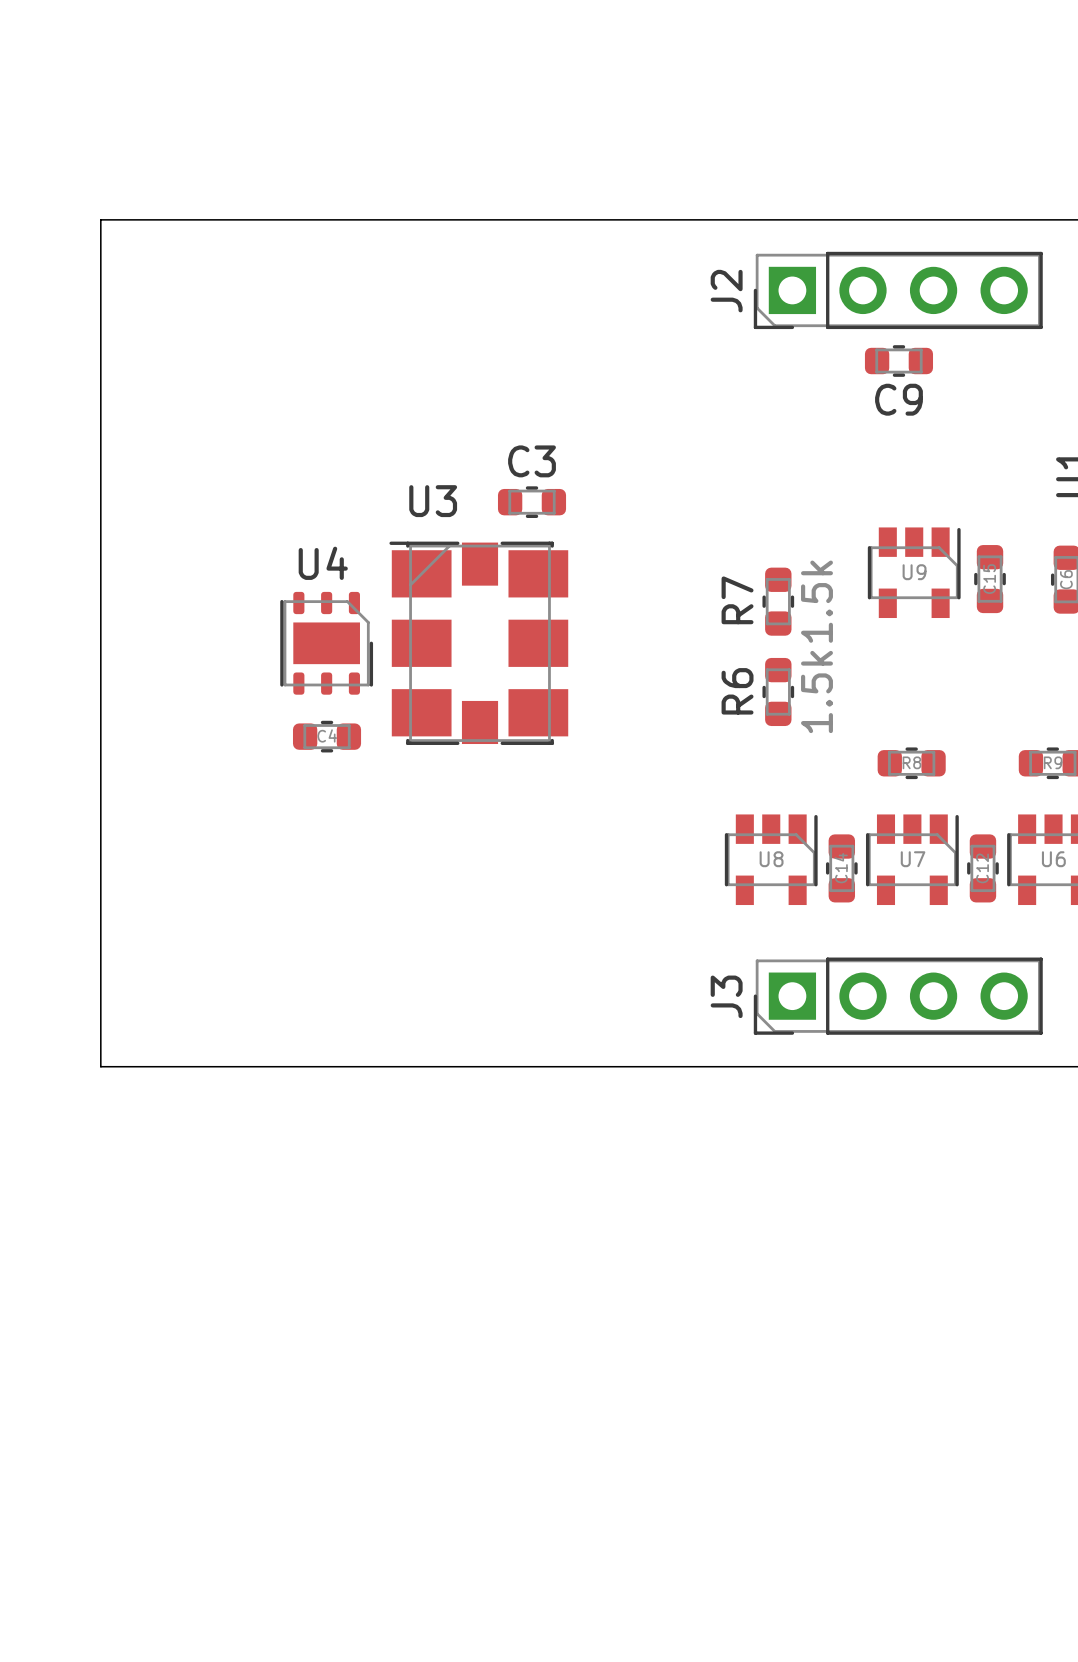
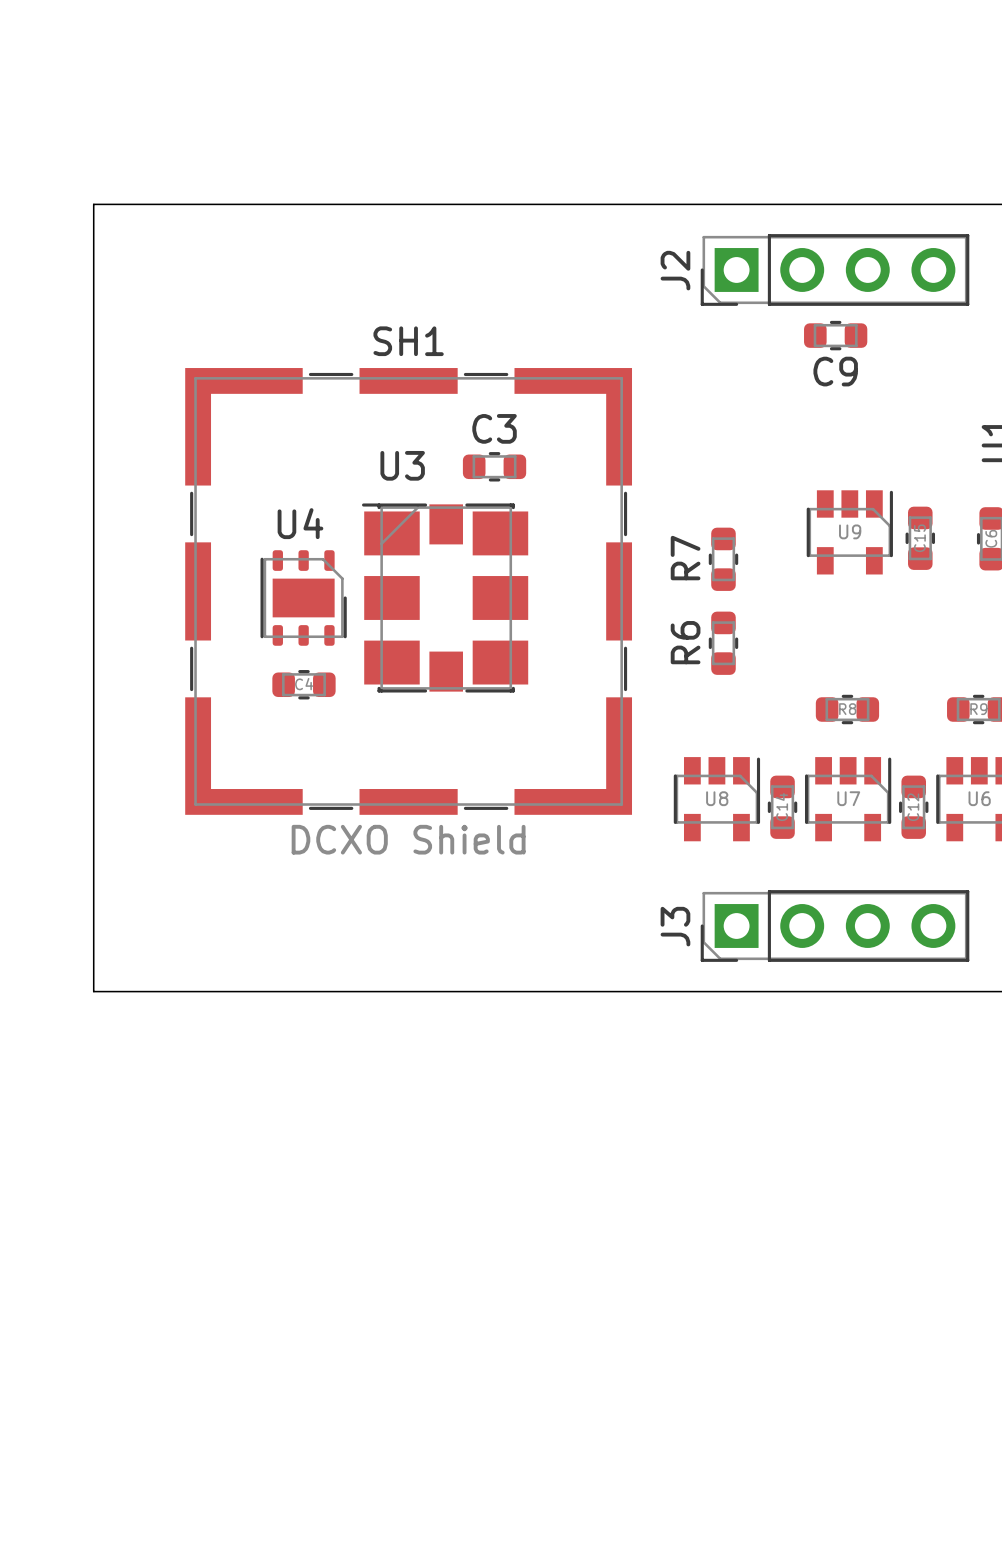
R7 value: 1.5k (816, 601) -> none
SH1: none -> DCXO Shield (408, 591)
R6 value: 1.5k (816, 691) -> none

